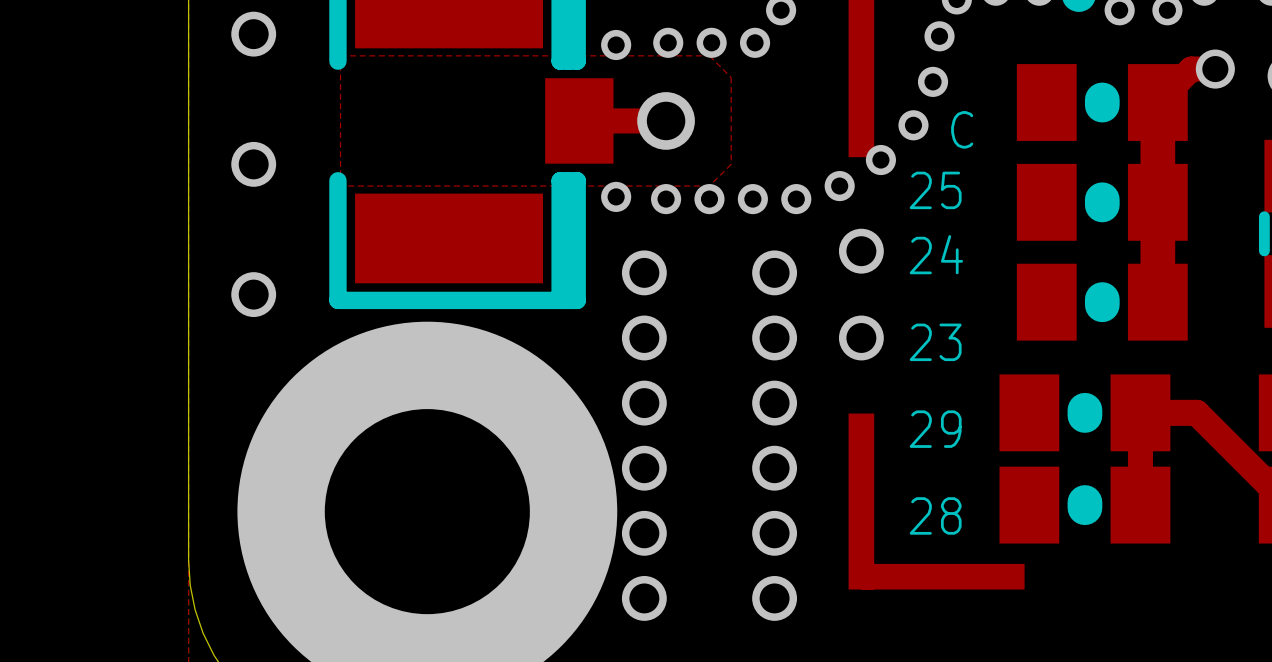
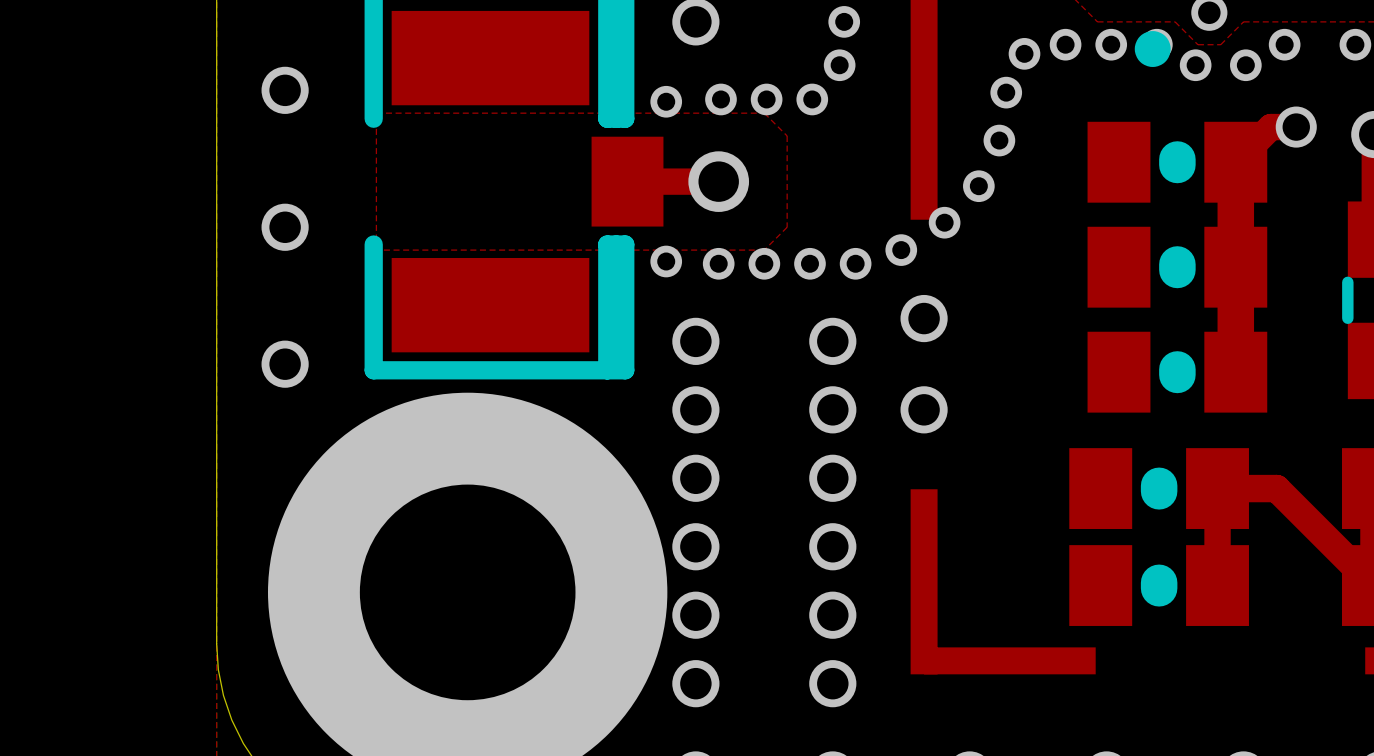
text: C (962, 129) -> none
text: 25 (935, 190) -> none
text: 24 (936, 254) -> none
text: 23 (935, 342) -> none
text: 29 (935, 429) -> none
text: 28 (935, 515) -> none

